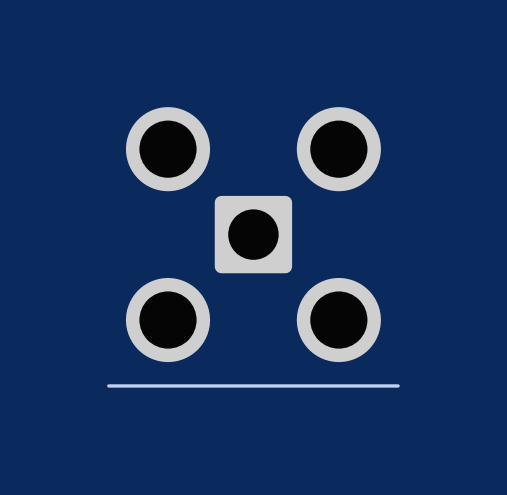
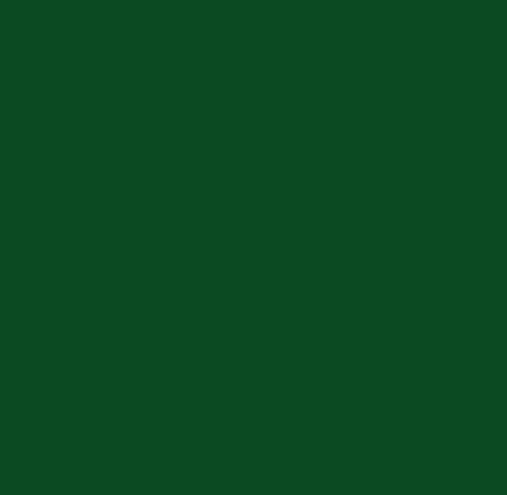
part: (253, 247) -> none

